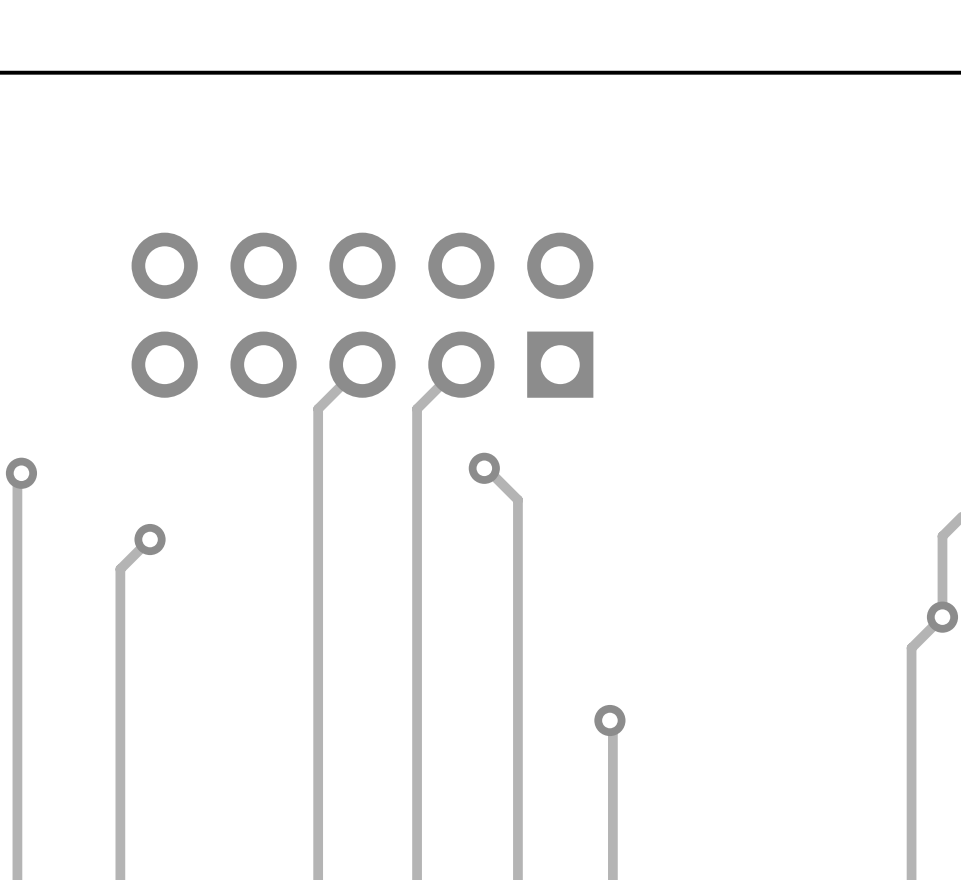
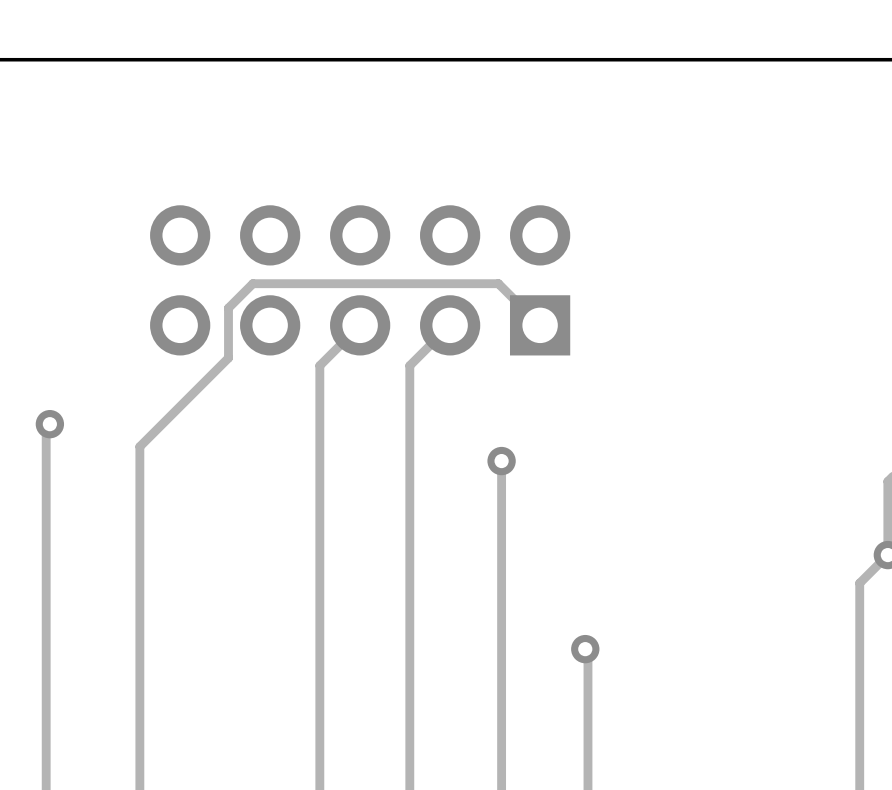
track: (484, 468) (517, 499) (517, 513) -> none
via position: (484, 468) -> (501, 461)
track: (150, 539) (120, 569) -> (540, 325) (498, 283) (252, 283) (228, 308) (228, 358) (139, 446) (139, 511)
via: (150, 539) -> none

